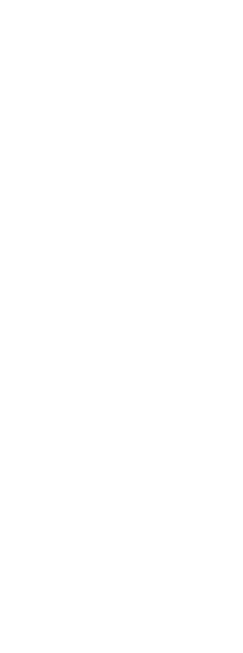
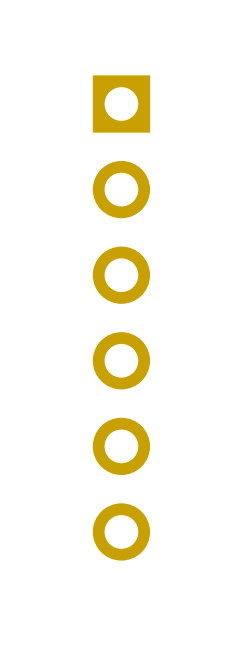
part: none -> (121, 317)

